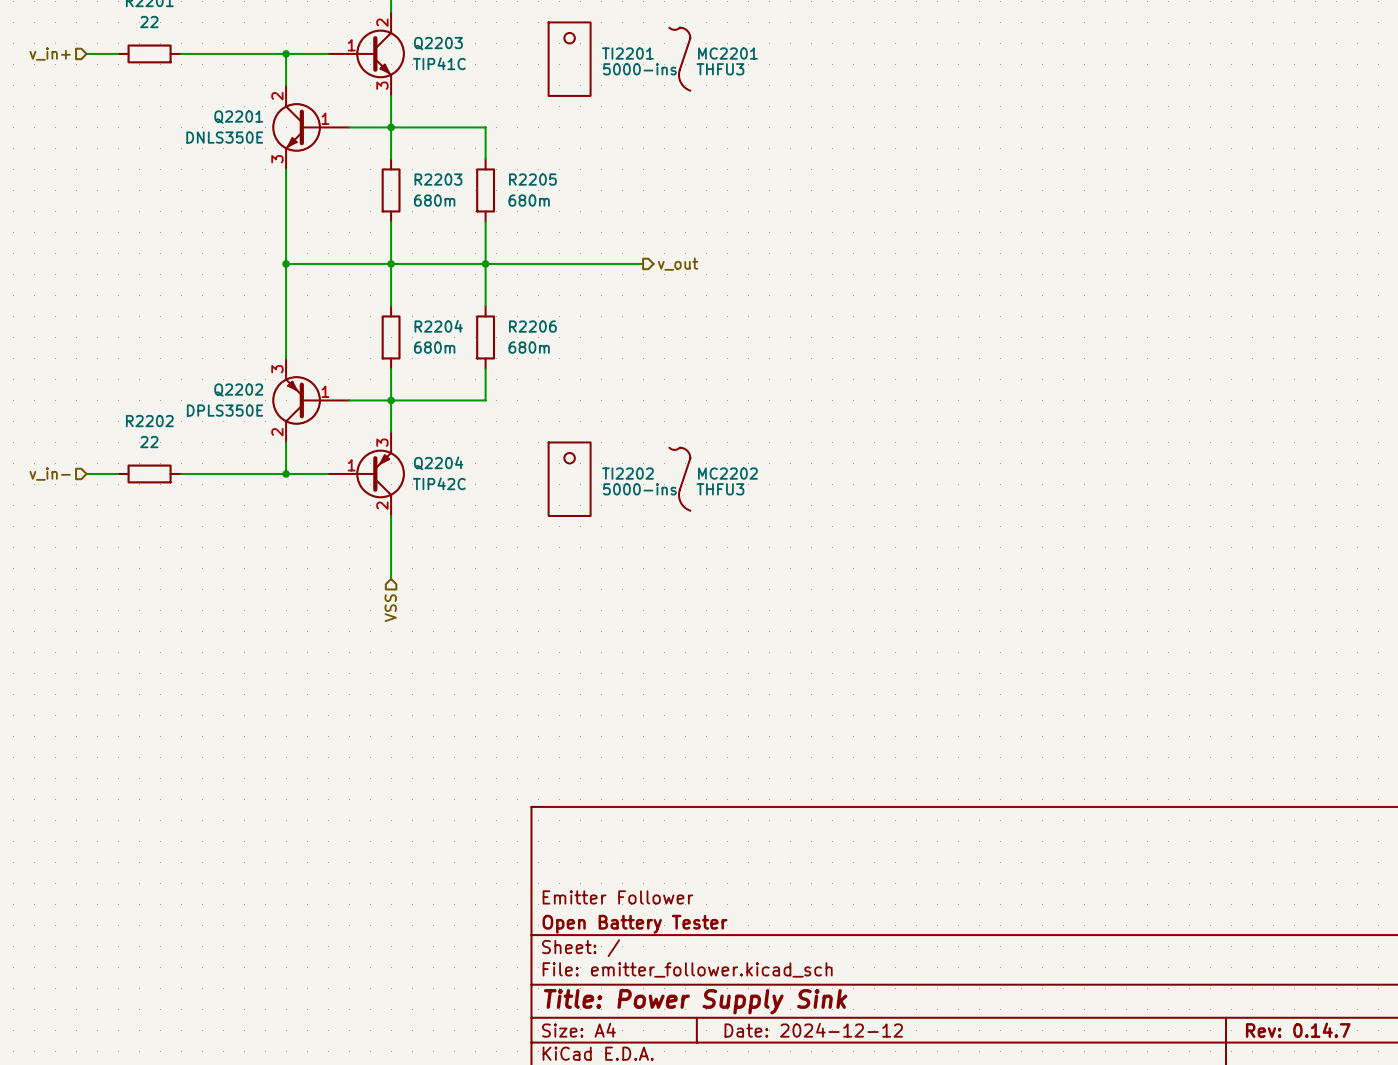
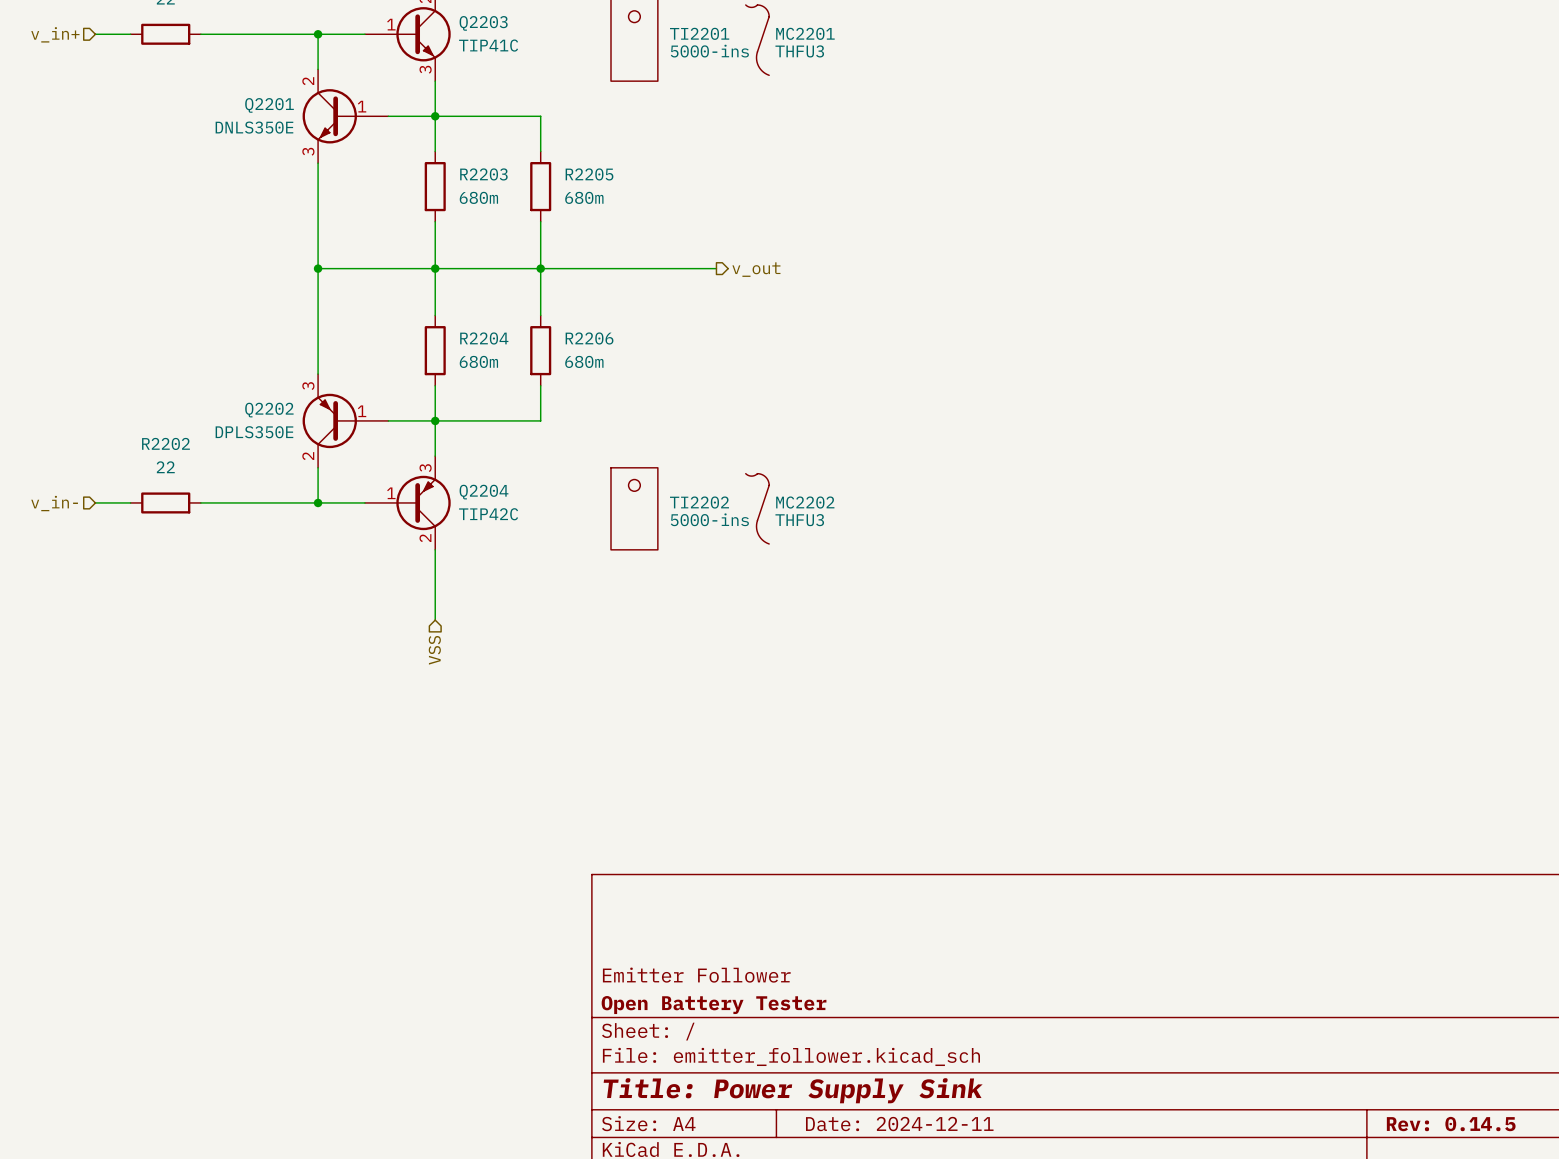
title block: Date: 2024-12-12 (813, 1030) -> Date: 2024-12-11 (899, 1124)
title block: Rev: 0.14.7 (1298, 1030) -> Rev: 0.14.5 (1451, 1124)

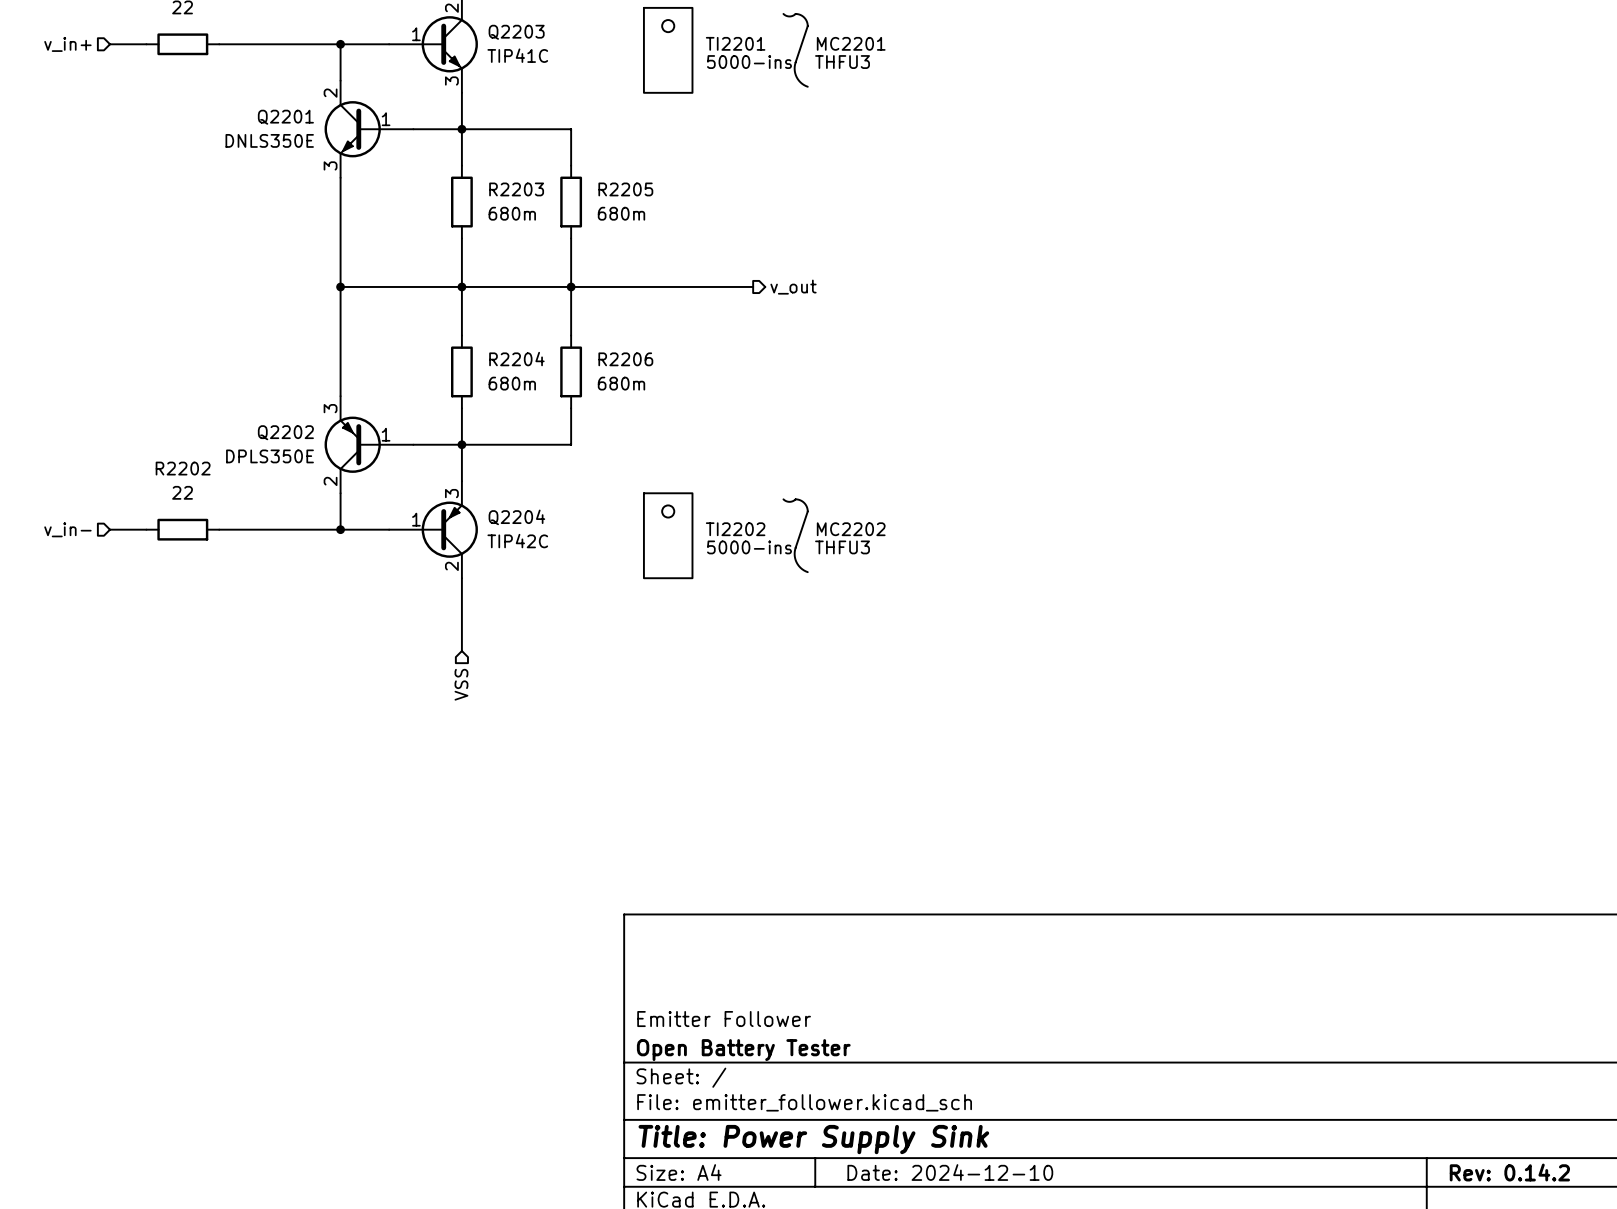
title block: Date: 2024-12-11 (899, 1124) -> Date: 2024-12-10 (950, 1172)
title block: Rev: 0.14.5 (1451, 1124) -> Rev: 0.14.2 (1509, 1172)

